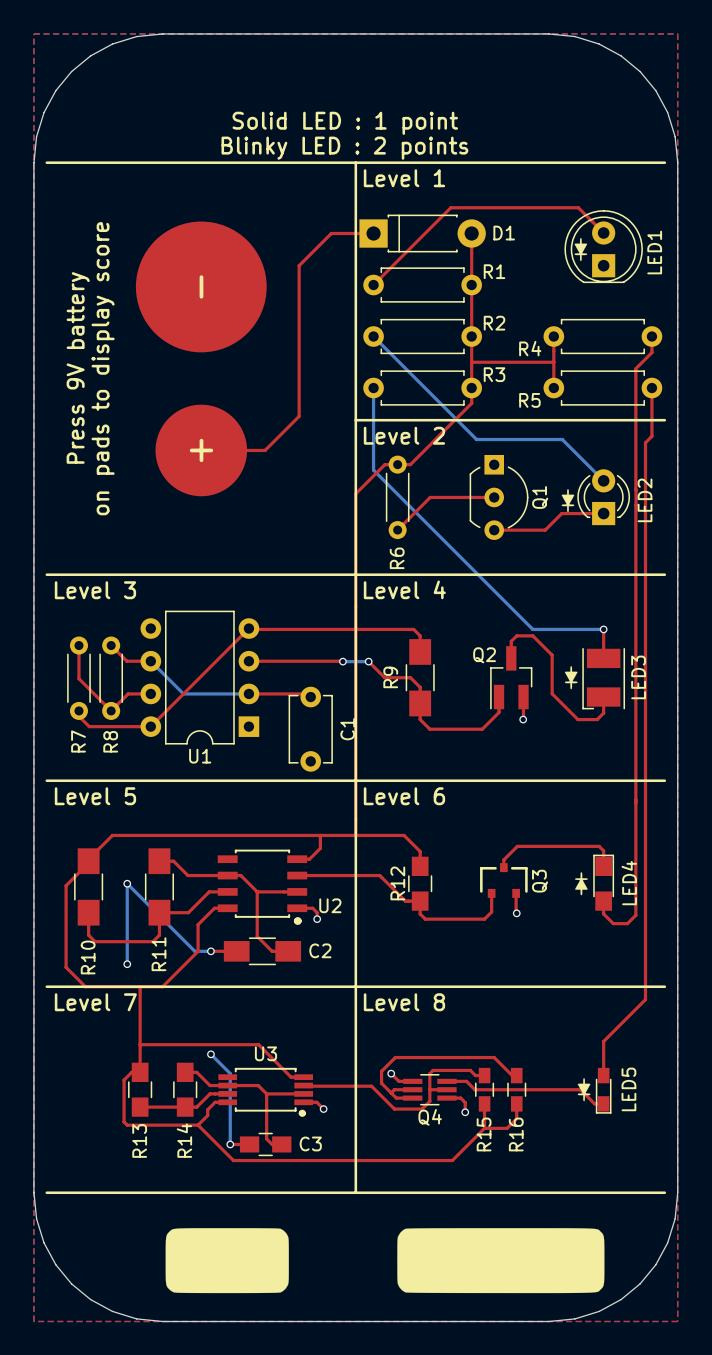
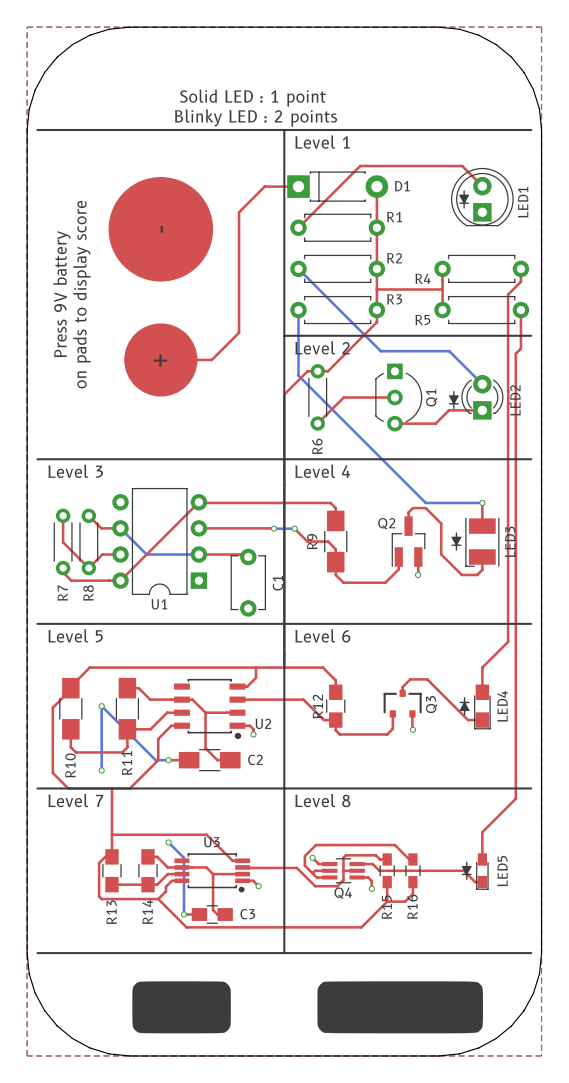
top track: (635, 803) (635, 915) (627, 923) (613, 923) (603, 913) (603, 901) -> (508, 641) (482, 667) (482, 679)
top track: (513, 850) (517, 846) (599, 846) (603, 850) -> (410, 679) (427, 679) (467, 720) (482, 720)
LED4 rotation: 0° (603, 882) -> 180° (482, 706)

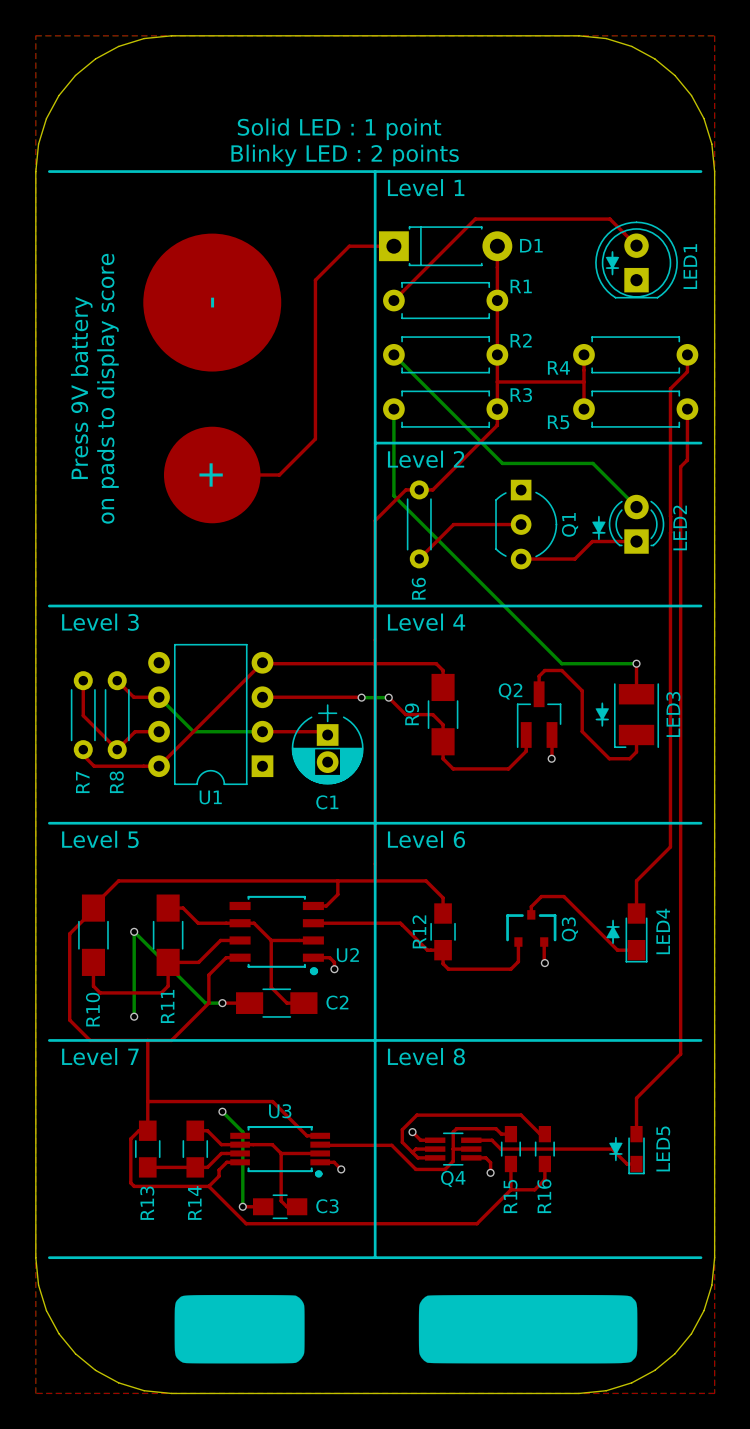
C1 footprint: [230, 548, 267, 617] -> [291, 704, 364, 785]
C1 name position: C1 (277, 583) -> C1 (327, 802)

